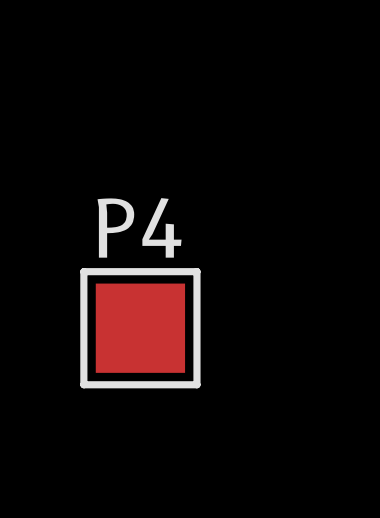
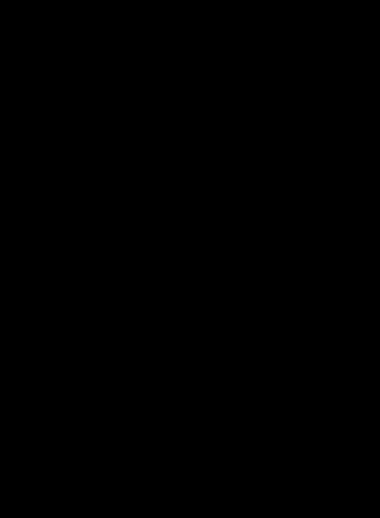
P4: (140, 328) -> none

